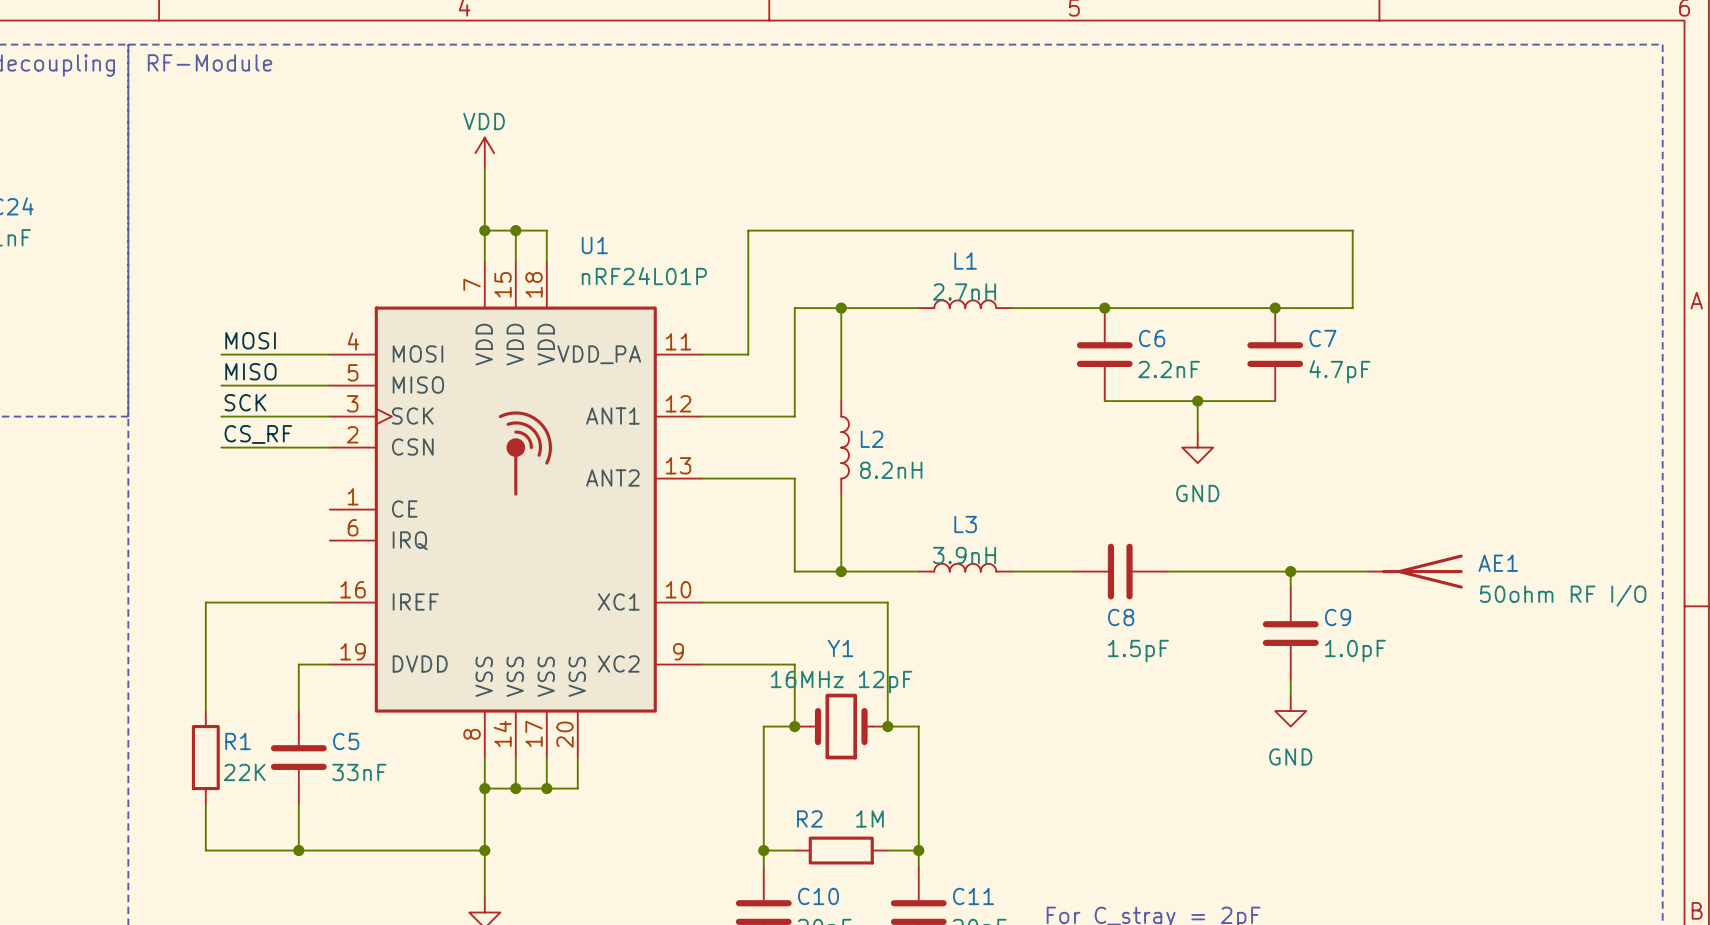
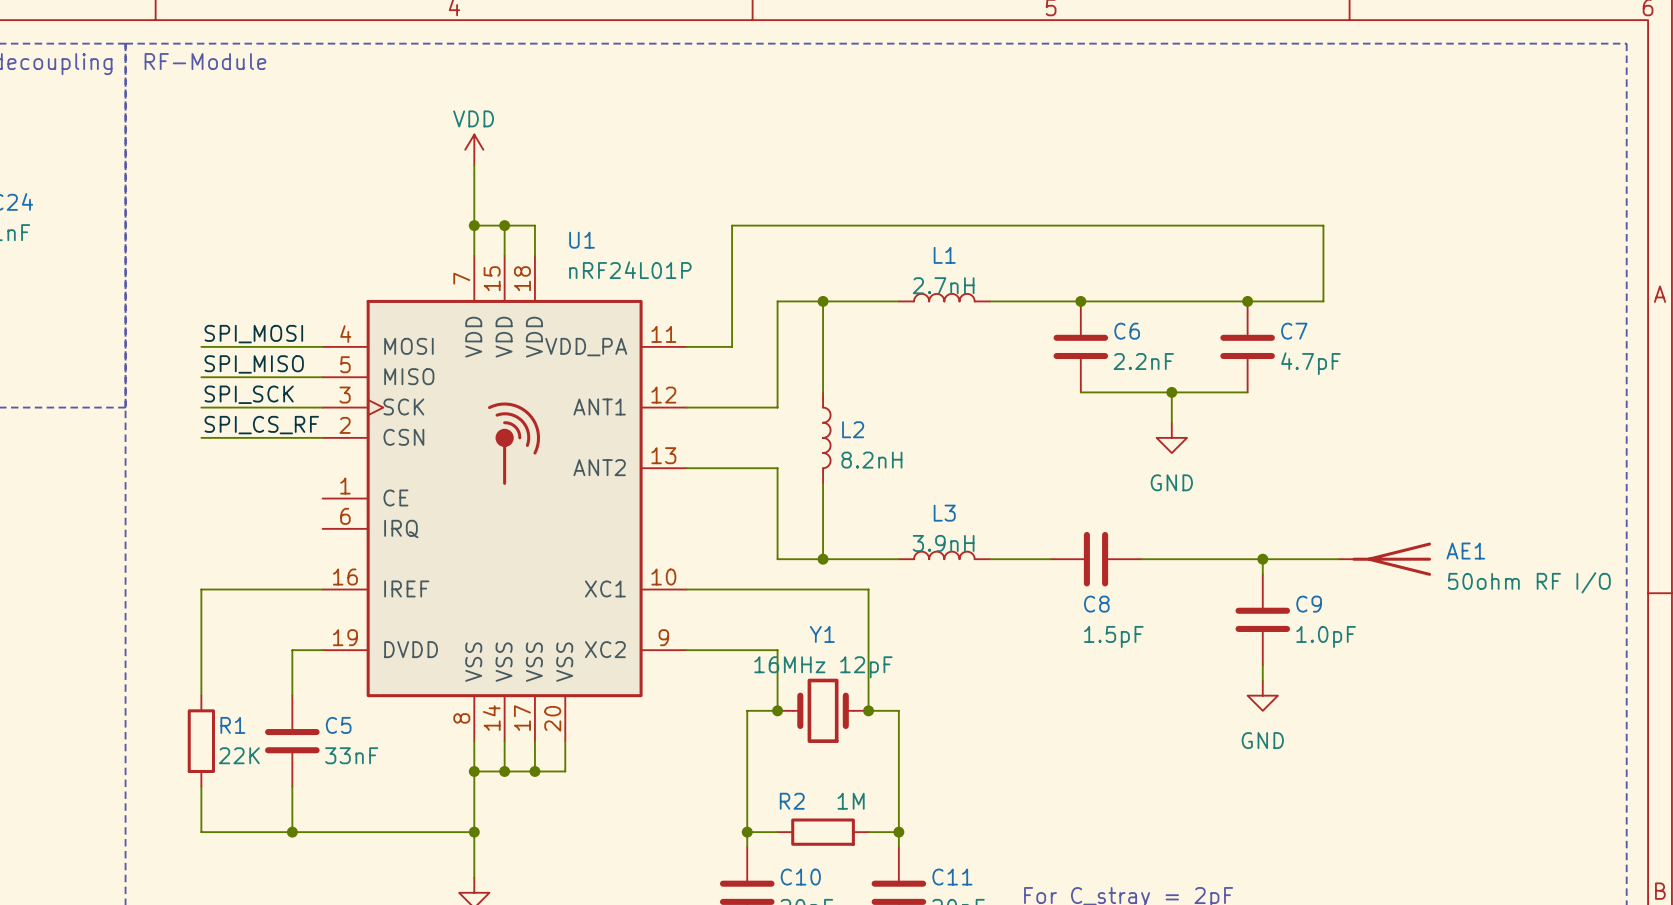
label: MOSI (250, 340) -> SPI_MOSI (253, 334)
wire: none -> (201, 346) (216, 346)
label: MISO (250, 371) -> SPI_MISO (254, 364)
wire: none -> (201, 377) (216, 377)
label: SCK (245, 402) -> none
label: none -> SPI_SCK (249, 394)
wire: none -> (201, 407) (216, 407)
label: CS_RF (258, 434) -> SPI_CS_RF (261, 425)
wire: none -> (201, 437) (216, 437)

